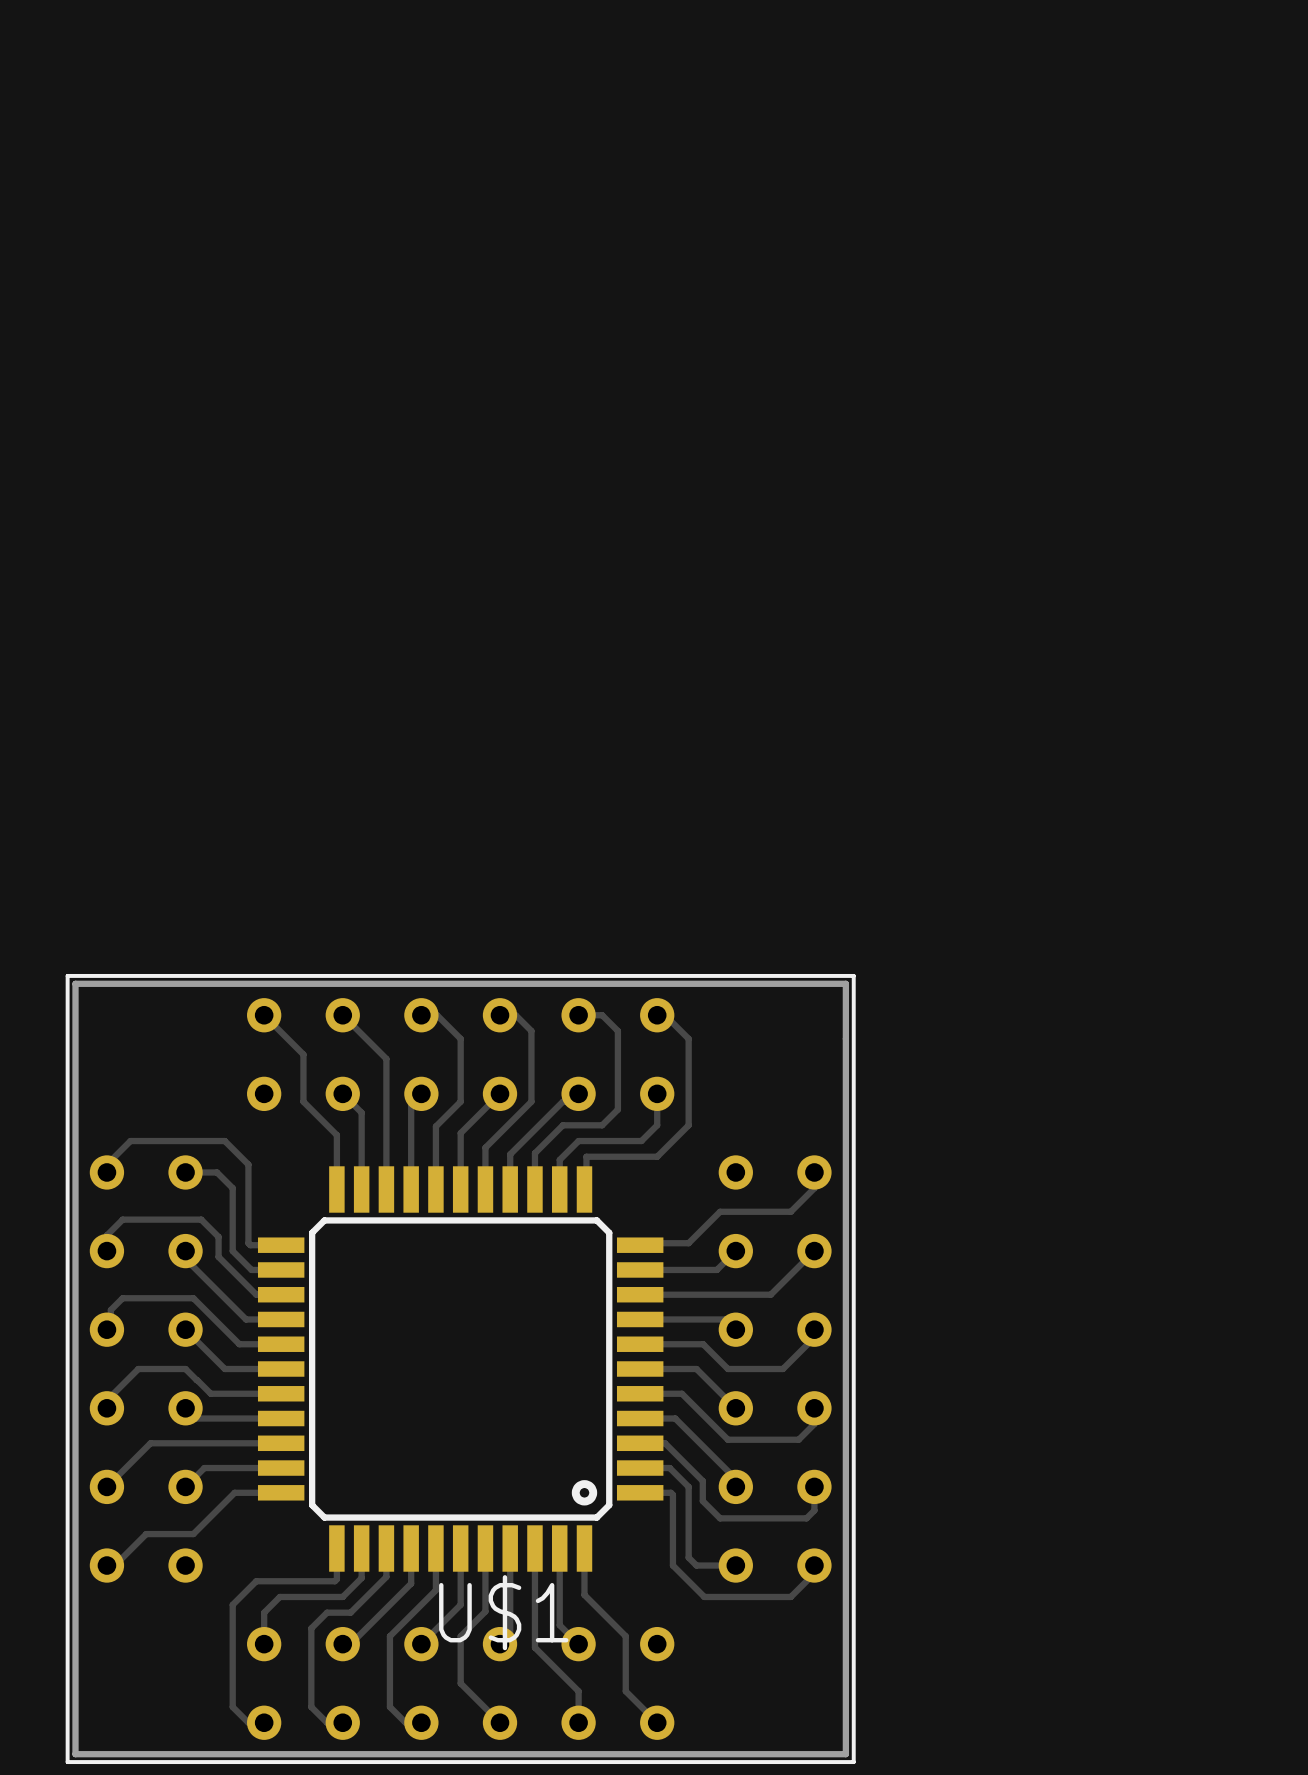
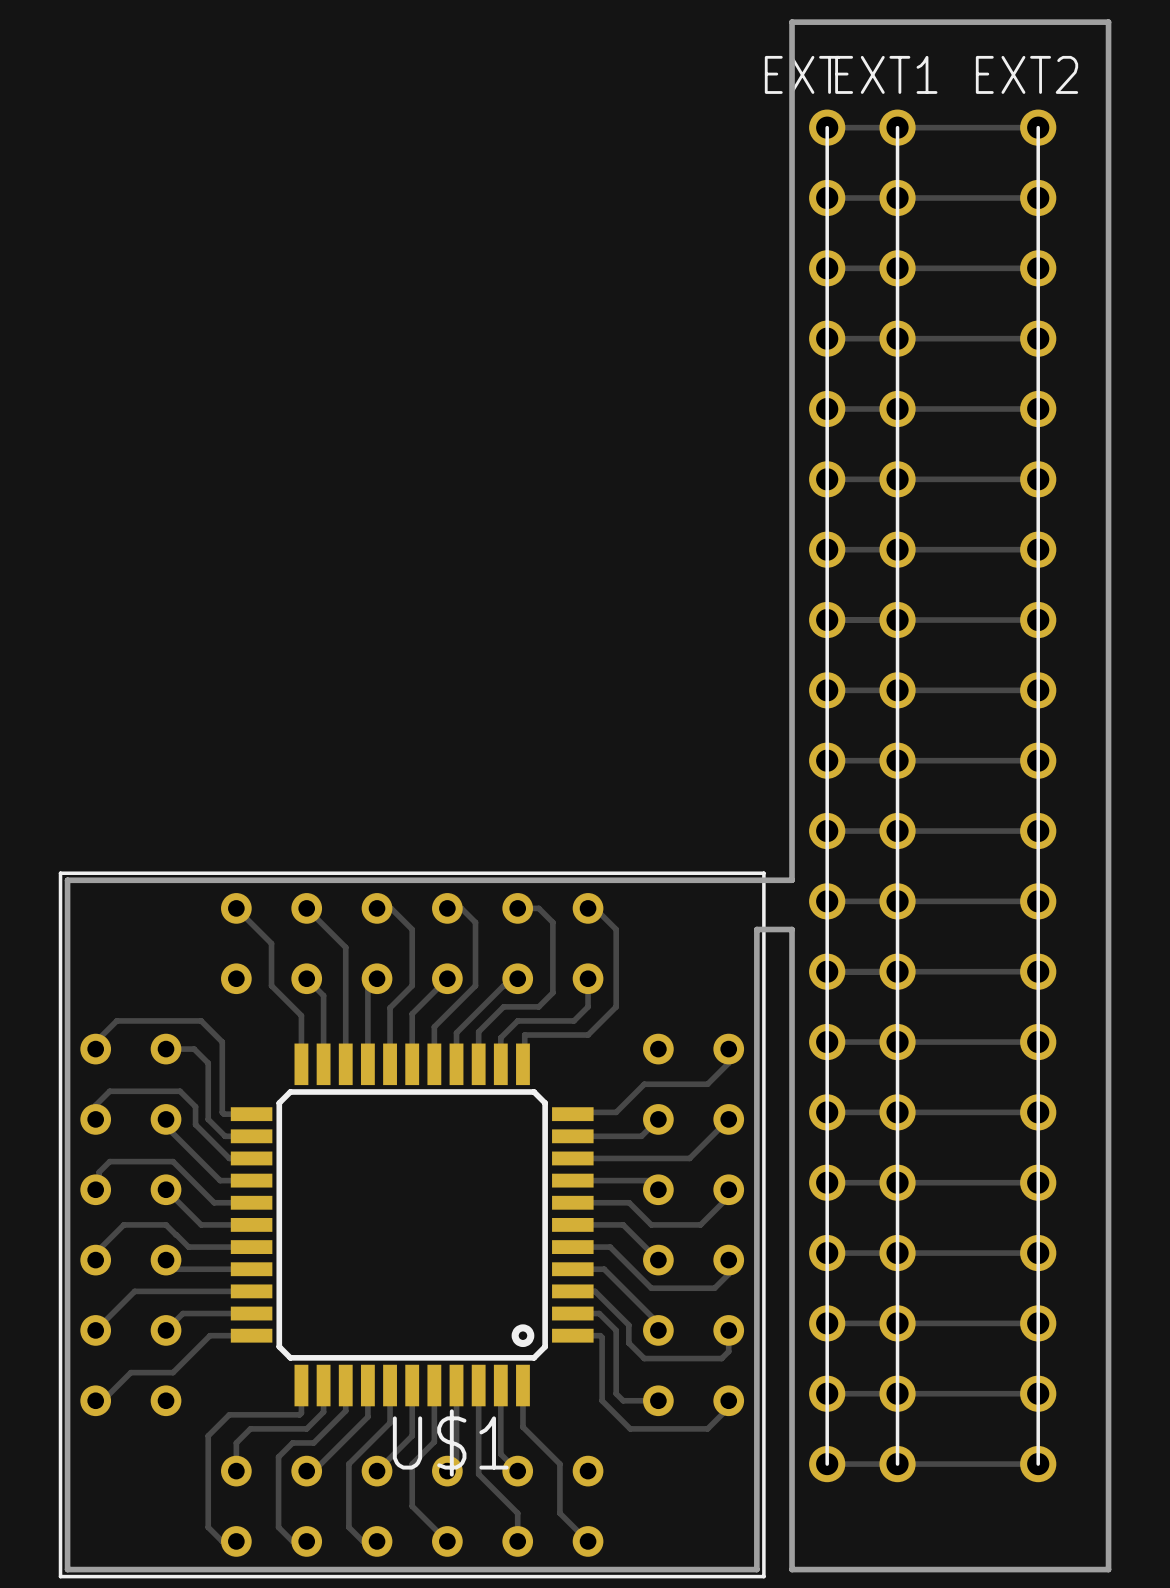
track: none -> (827, 127) (1038, 127)
track: none -> (827, 197) (1038, 197)
track: none -> (827, 268) (1038, 268)
track: none -> (827, 338) (1038, 338)
track: none -> (827, 409) (1038, 409)
track: none -> (827, 479) (1038, 479)
track: none -> (827, 549) (1038, 549)
track: none -> (827, 620) (1038, 620)
track: none -> (827, 690) (1038, 690)
track: none -> (827, 760) (1038, 760)
EXT: none -> (827, 795)
EXT1: none -> (897, 795)
EXT2: none -> (1038, 795)
track: none -> (827, 831) (1038, 831)
board edge: (845, 983) (845, 1038) -> (756, 880) (792, 880) (792, 22) (1108, 22) (1108, 1569) (792, 1569) (792, 929) (756, 929)
track: none -> (827, 901) (1038, 901)
track: none -> (827, 971) (1038, 971)
track: none -> (827, 1042) (1038, 1042)
track: none -> (827, 1112) (1038, 1112)
track: none -> (827, 1182) (1038, 1182)
track: none -> (827, 1253) (1038, 1253)
track: none -> (827, 1323) (1038, 1323)
track: none -> (827, 1393) (1038, 1393)
track: none -> (827, 1464) (1038, 1464)

